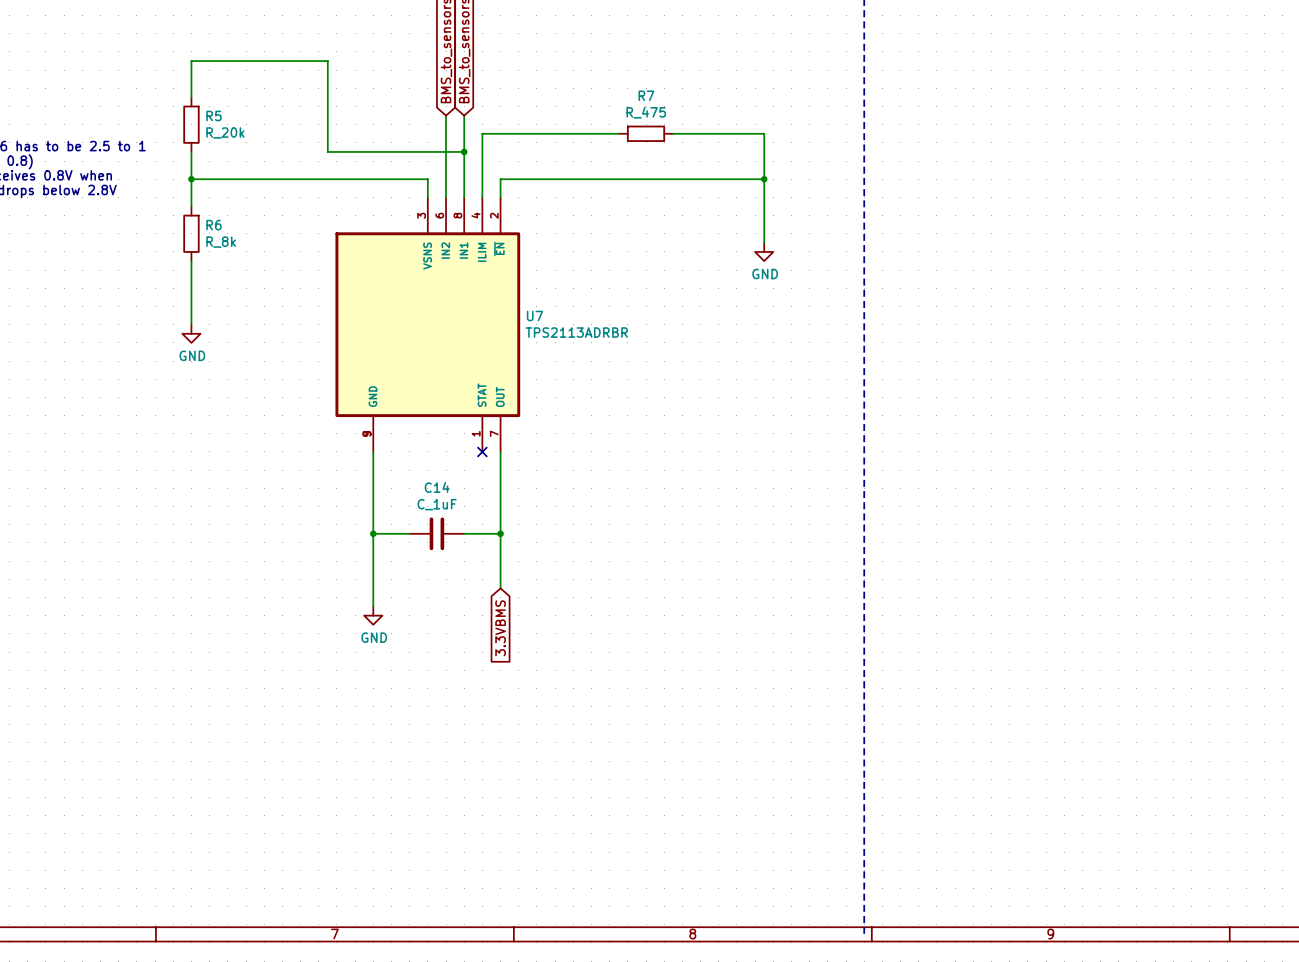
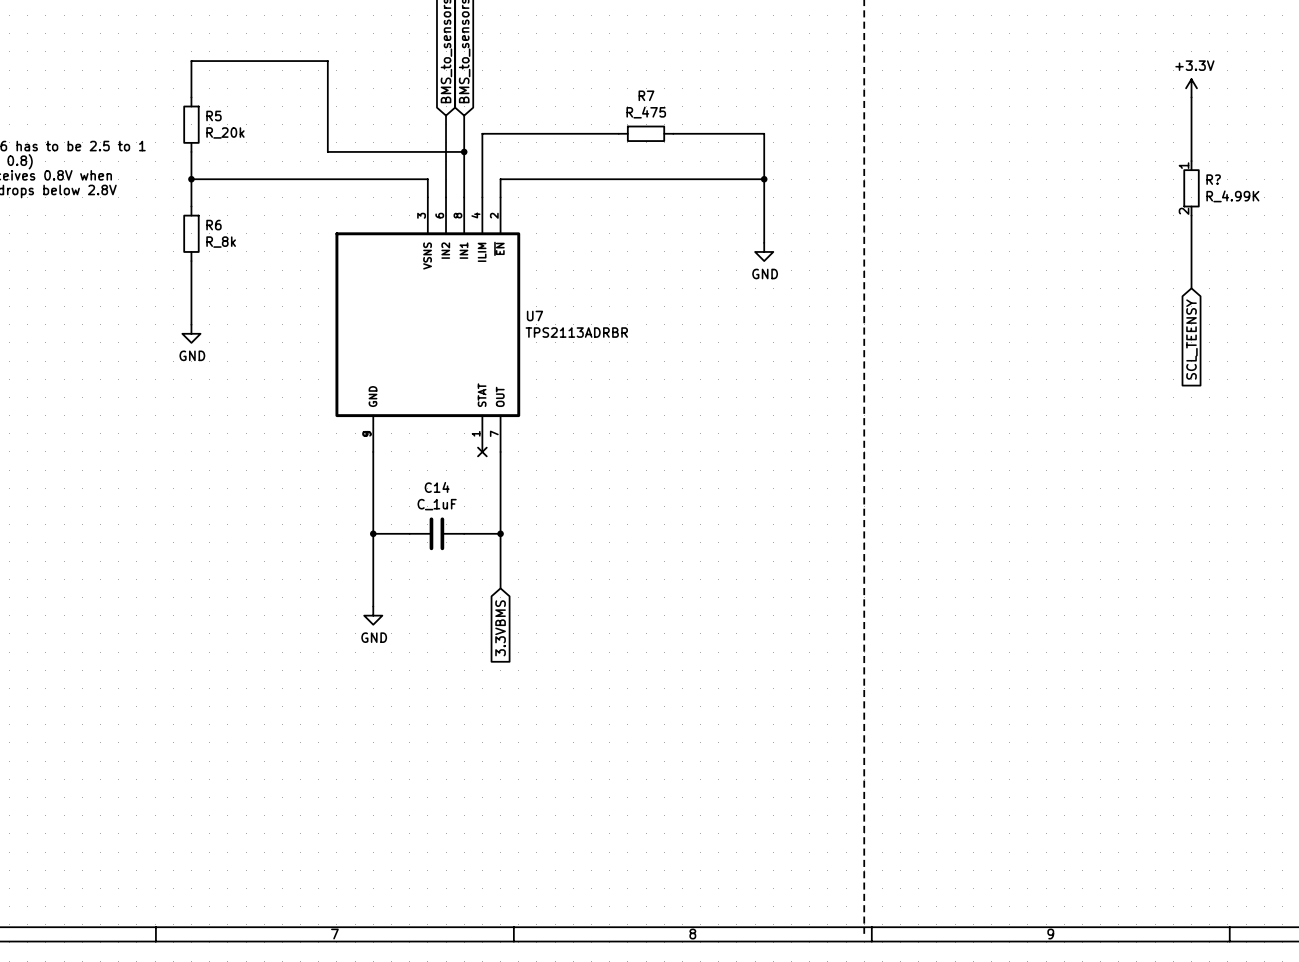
power symbol: none -> +3.3V (1191, 88)
wire: none -> (1191, 97) (1191, 161)
R?: none -> R_4.99K (1191, 188)
wire: none -> (1191, 215) (1191, 288)
global label: none -> SCL_TEENSY (1191, 339)

